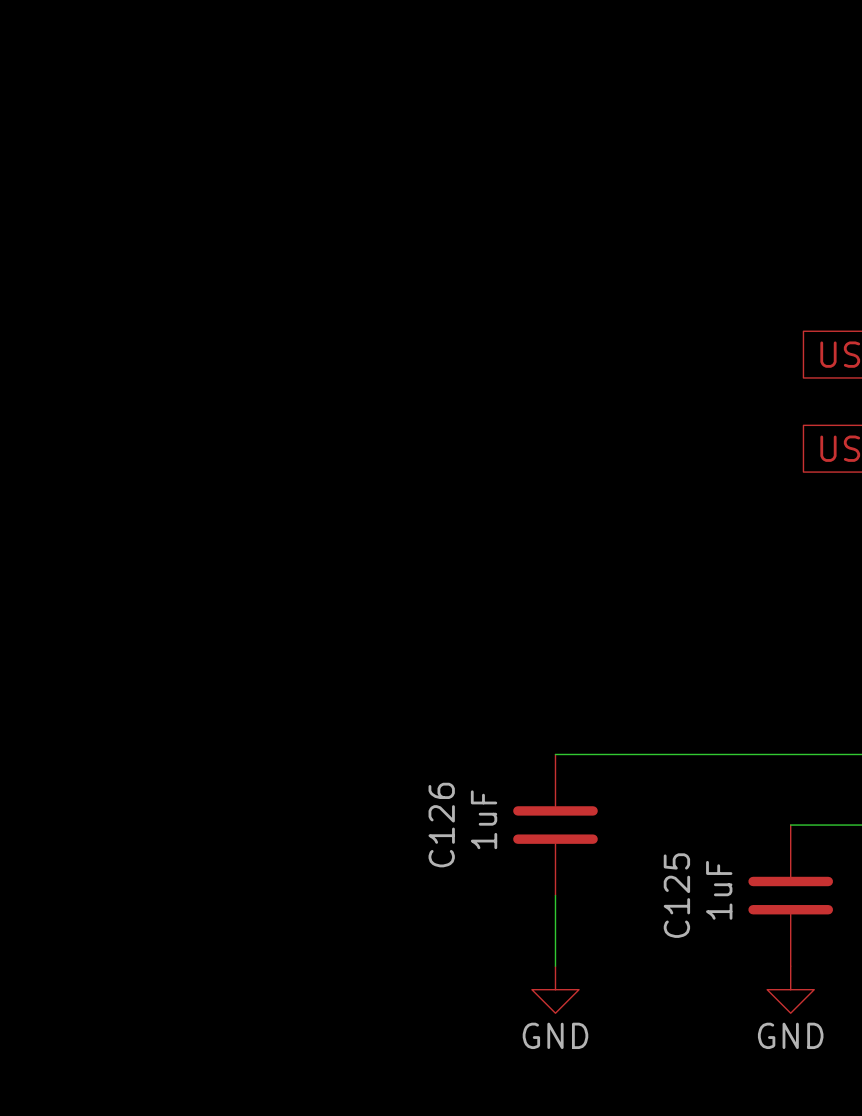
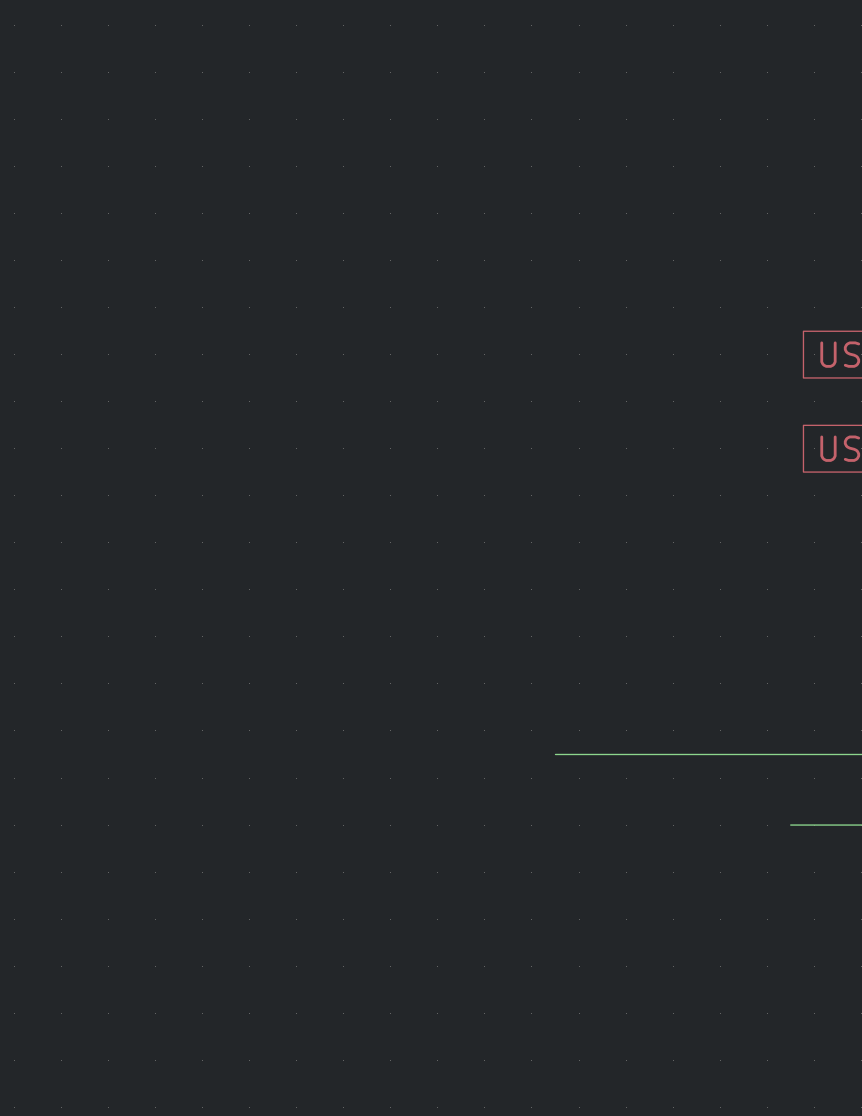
C126: 1uF (555, 825) -> none
wire: (555, 895) (555, 966) -> none
C125: 1uF (790, 895) -> none
power symbol: GND (555, 989) -> none
power symbol: GND (790, 989) -> none

